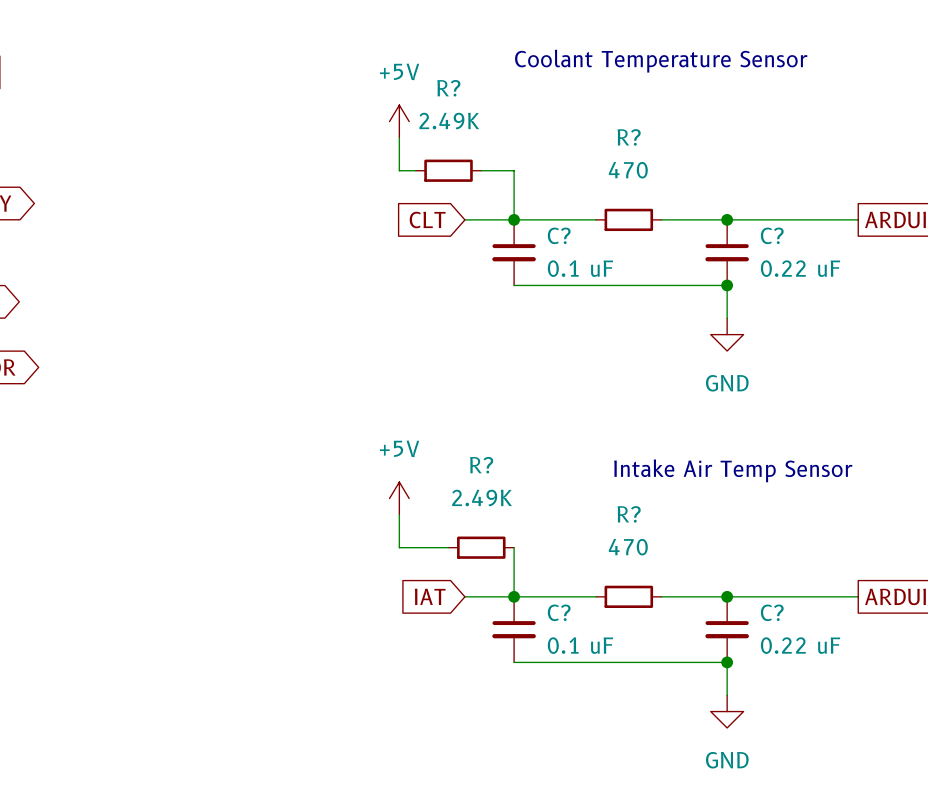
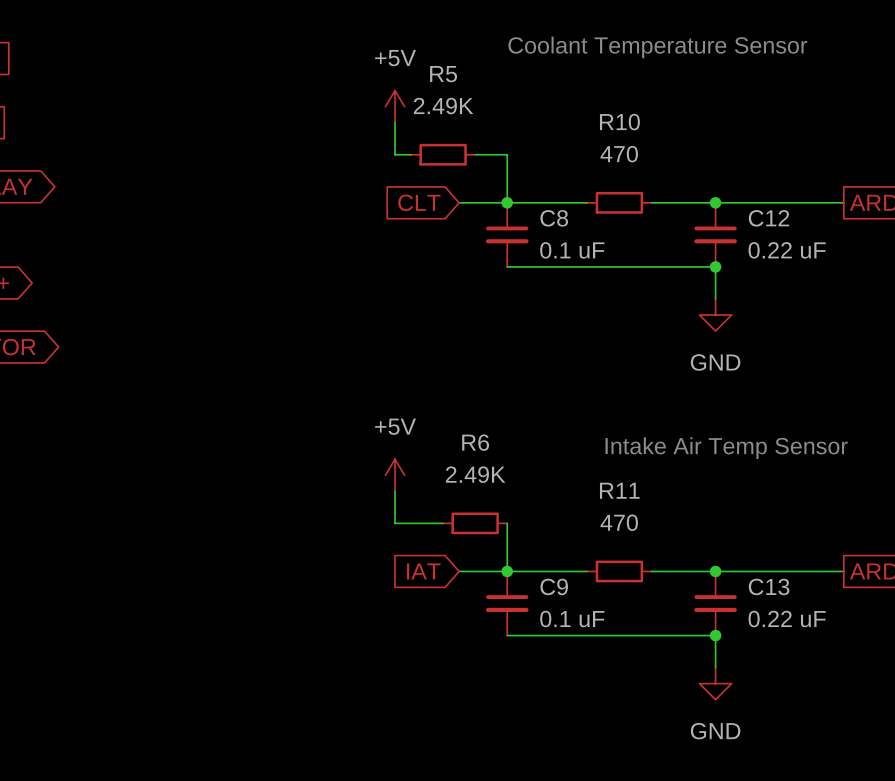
R? name: R? (448, 88) -> R5 (443, 74)
R? name: R? (629, 137) -> R10 (619, 122)
C? name: C? (559, 235) -> C8 (554, 218)
C? name: C? (772, 235) -> C12 (769, 218)
R? name: R? (481, 465) -> R6 (475, 442)
R? name: R? (629, 514) -> R11 (619, 490)
C? name: C? (559, 612) -> C9 (554, 586)
C? name: C? (772, 612) -> C13 (769, 586)

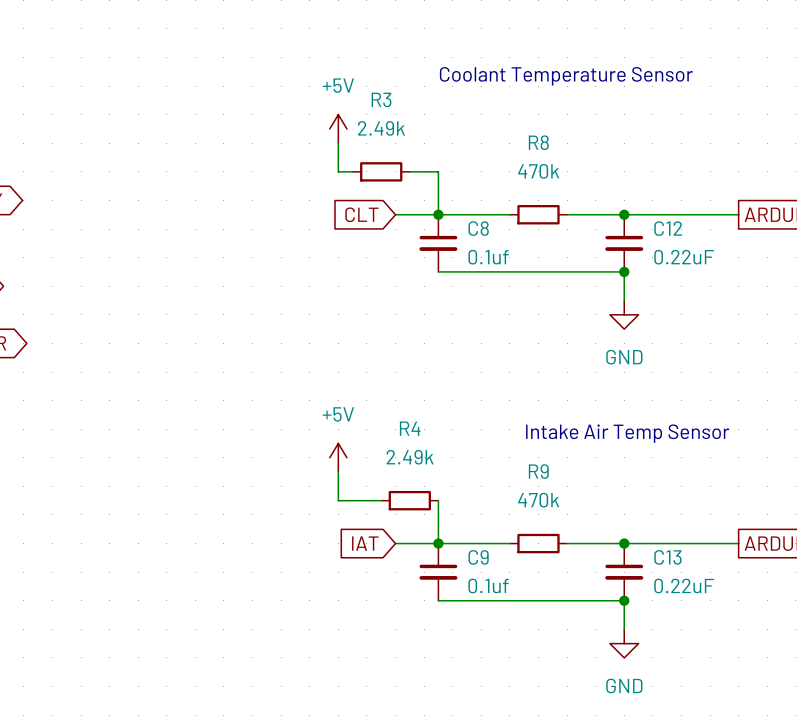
R5 name: R5 (443, 74) -> R3 (381, 99)
R5 value: 2.49K (443, 106) -> 2.49k (381, 128)
R10 name: R10 (619, 122) -> R8 (538, 142)
R10 value: 470 (619, 154) -> 470k (538, 171)
C8 value: 0.1 uF (572, 250) -> 0.1uf (488, 257)
C12 value: 0.22 uF (787, 250) -> 0.22uF (684, 257)
R6 name: R6 (475, 442) -> R4 (410, 428)
R6 value: 2.49K (475, 474) -> 2.49k (410, 457)
R11 name: R11 (619, 490) -> R9 (538, 471)
R11 value: 470 (619, 522) -> 470k (538, 500)
C9 value: 0.1 uF (572, 619) -> 0.1uf (488, 585)
C13 value: 0.22 uF (787, 619) -> 0.22uF (684, 585)

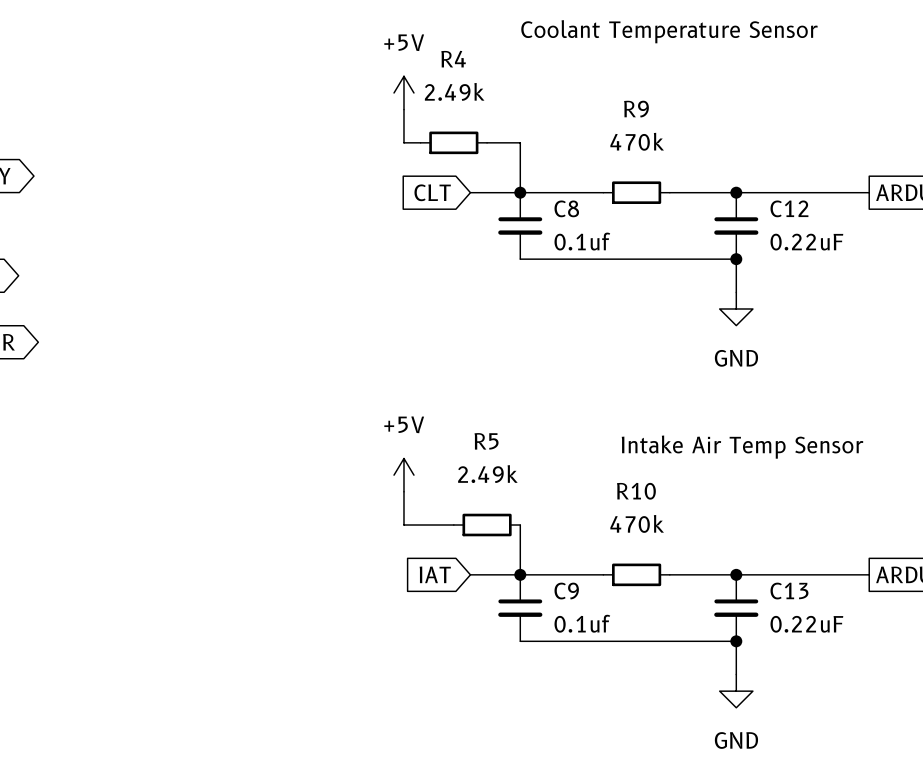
R3 name: R3 (381, 99) -> R4 (453, 59)
R8 name: R8 (538, 142) -> R9 (636, 109)
R4 name: R4 (410, 428) -> R5 (486, 441)
R9 name: R9 (538, 471) -> R10 (636, 491)

